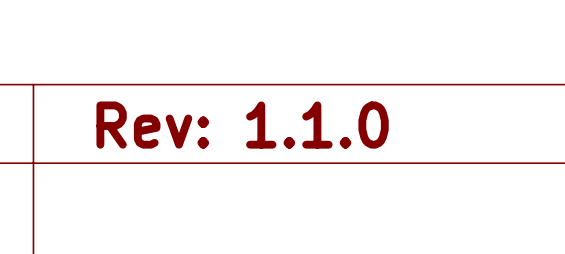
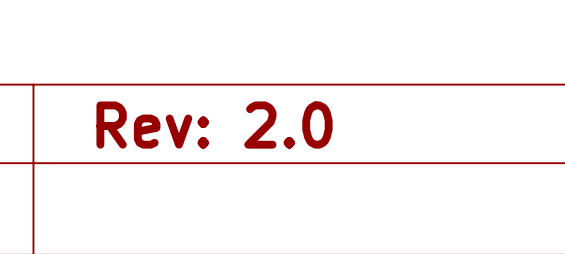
title block: Rev: 1.1.0 (242, 125) -> Rev: 2.0 (214, 125)

